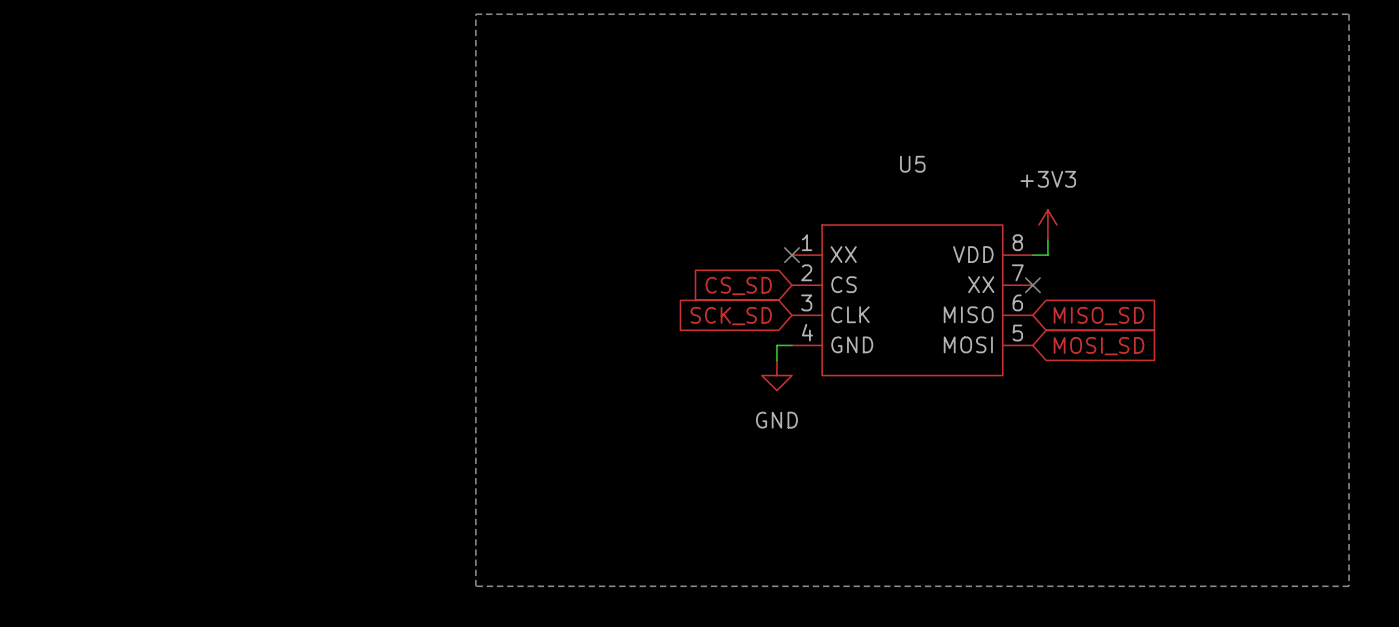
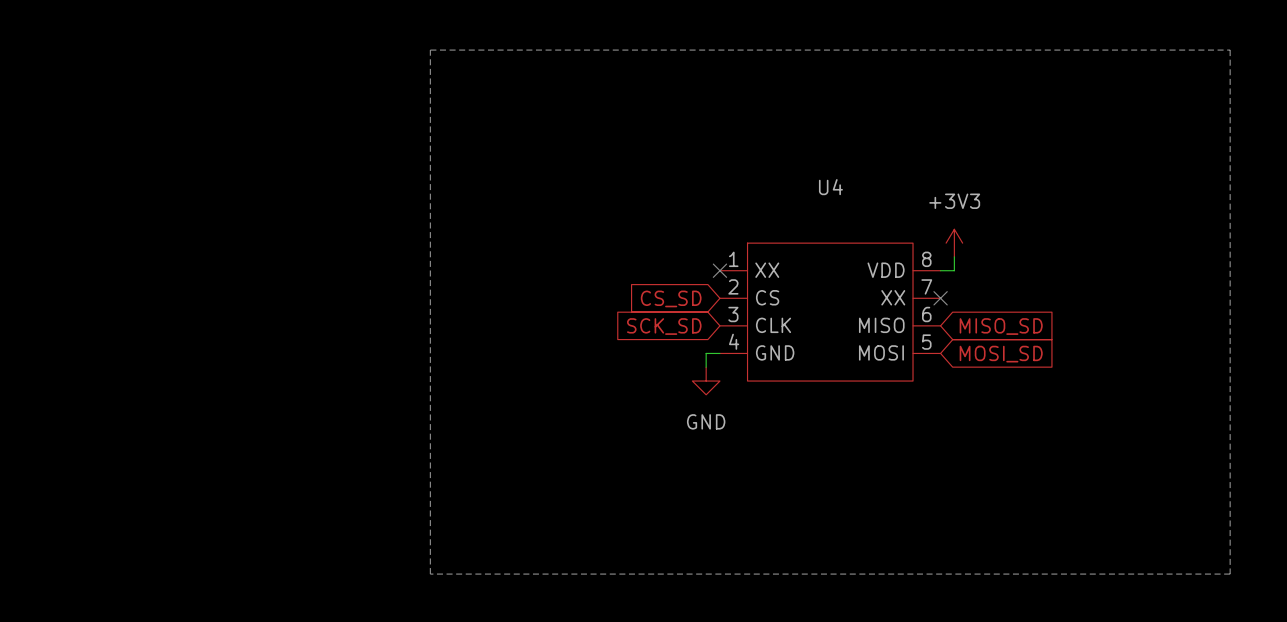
U5 name: U5 (912, 164) -> U4 (830, 187)

